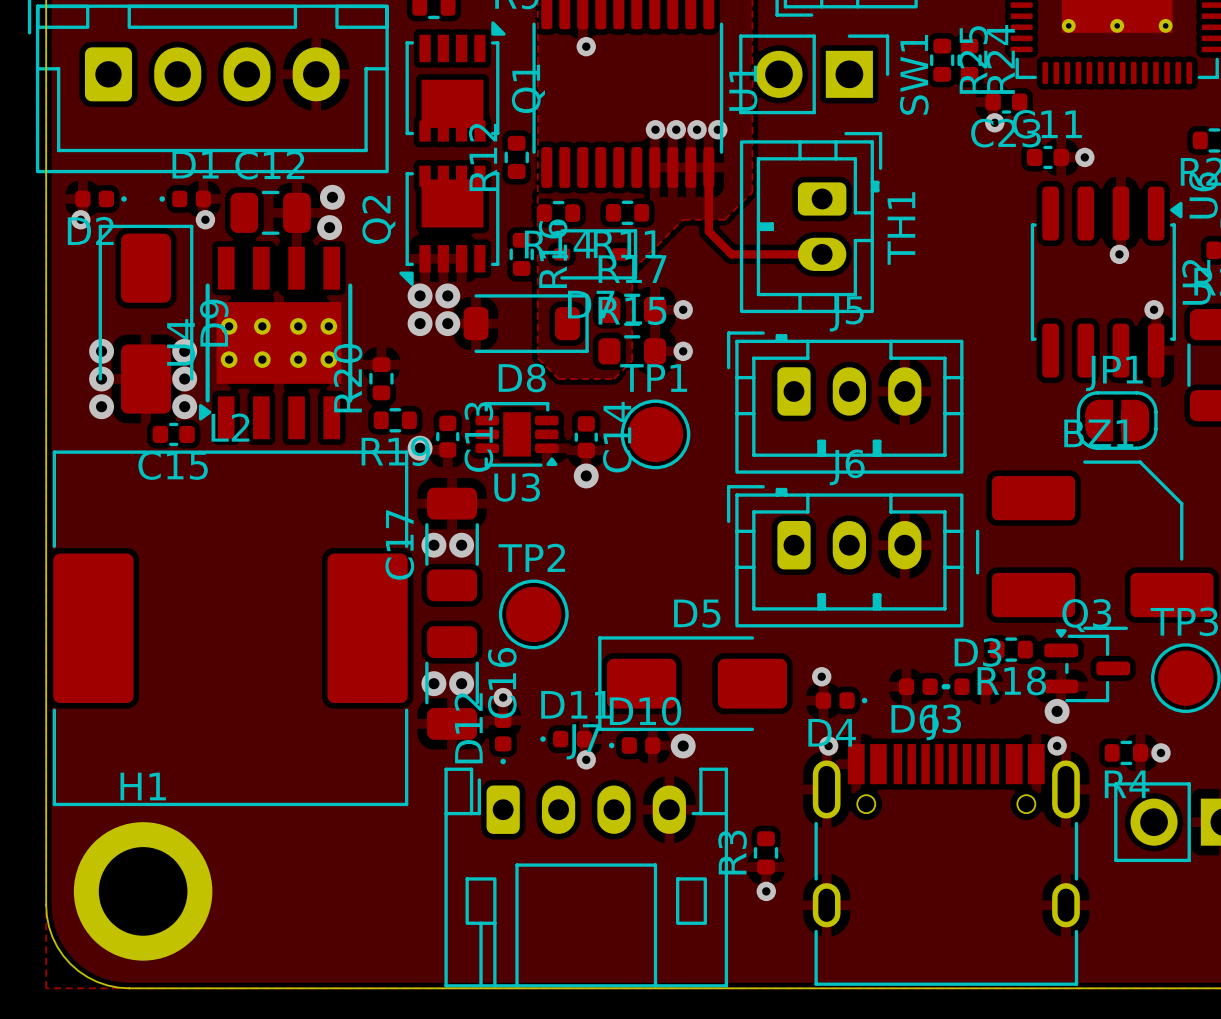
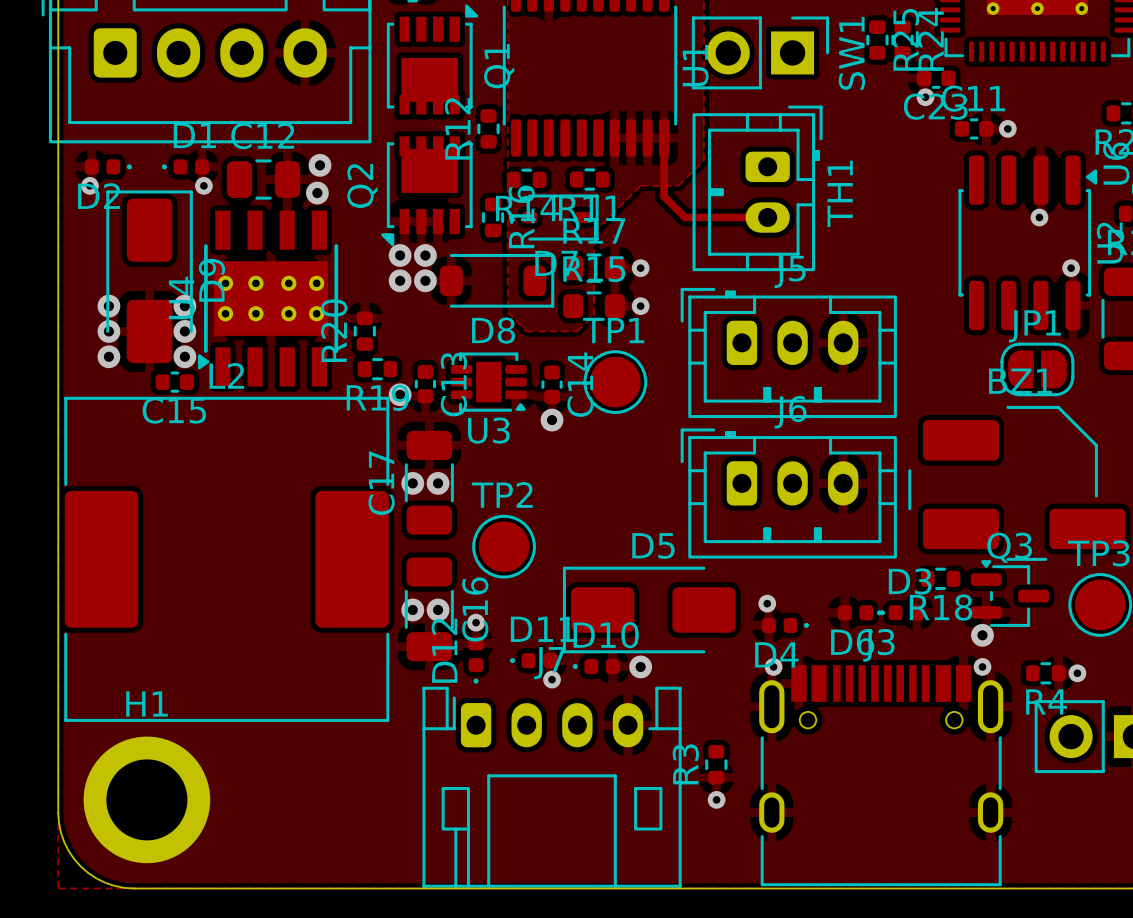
via: (586, 46) -> none
via: (655, 129) -> none
via: (676, 129) -> none
via: (697, 129) -> none
via: (717, 129) -> none

